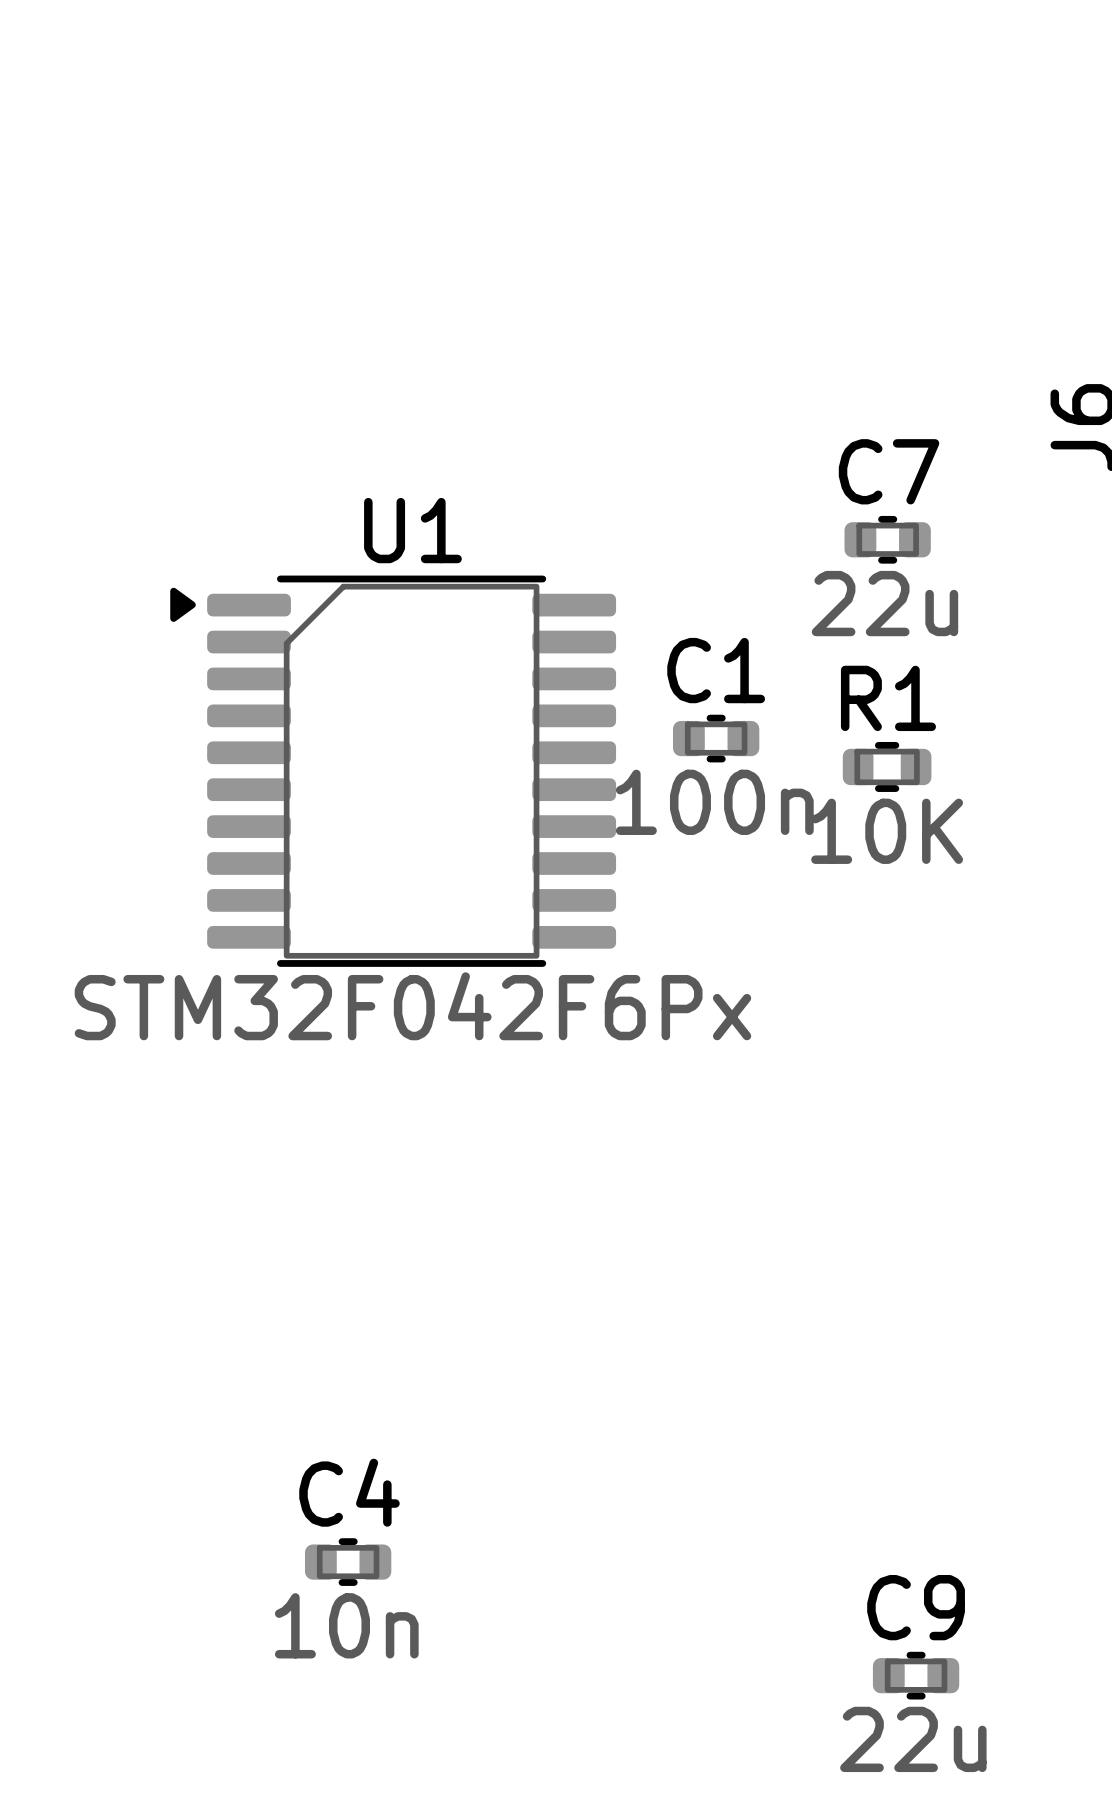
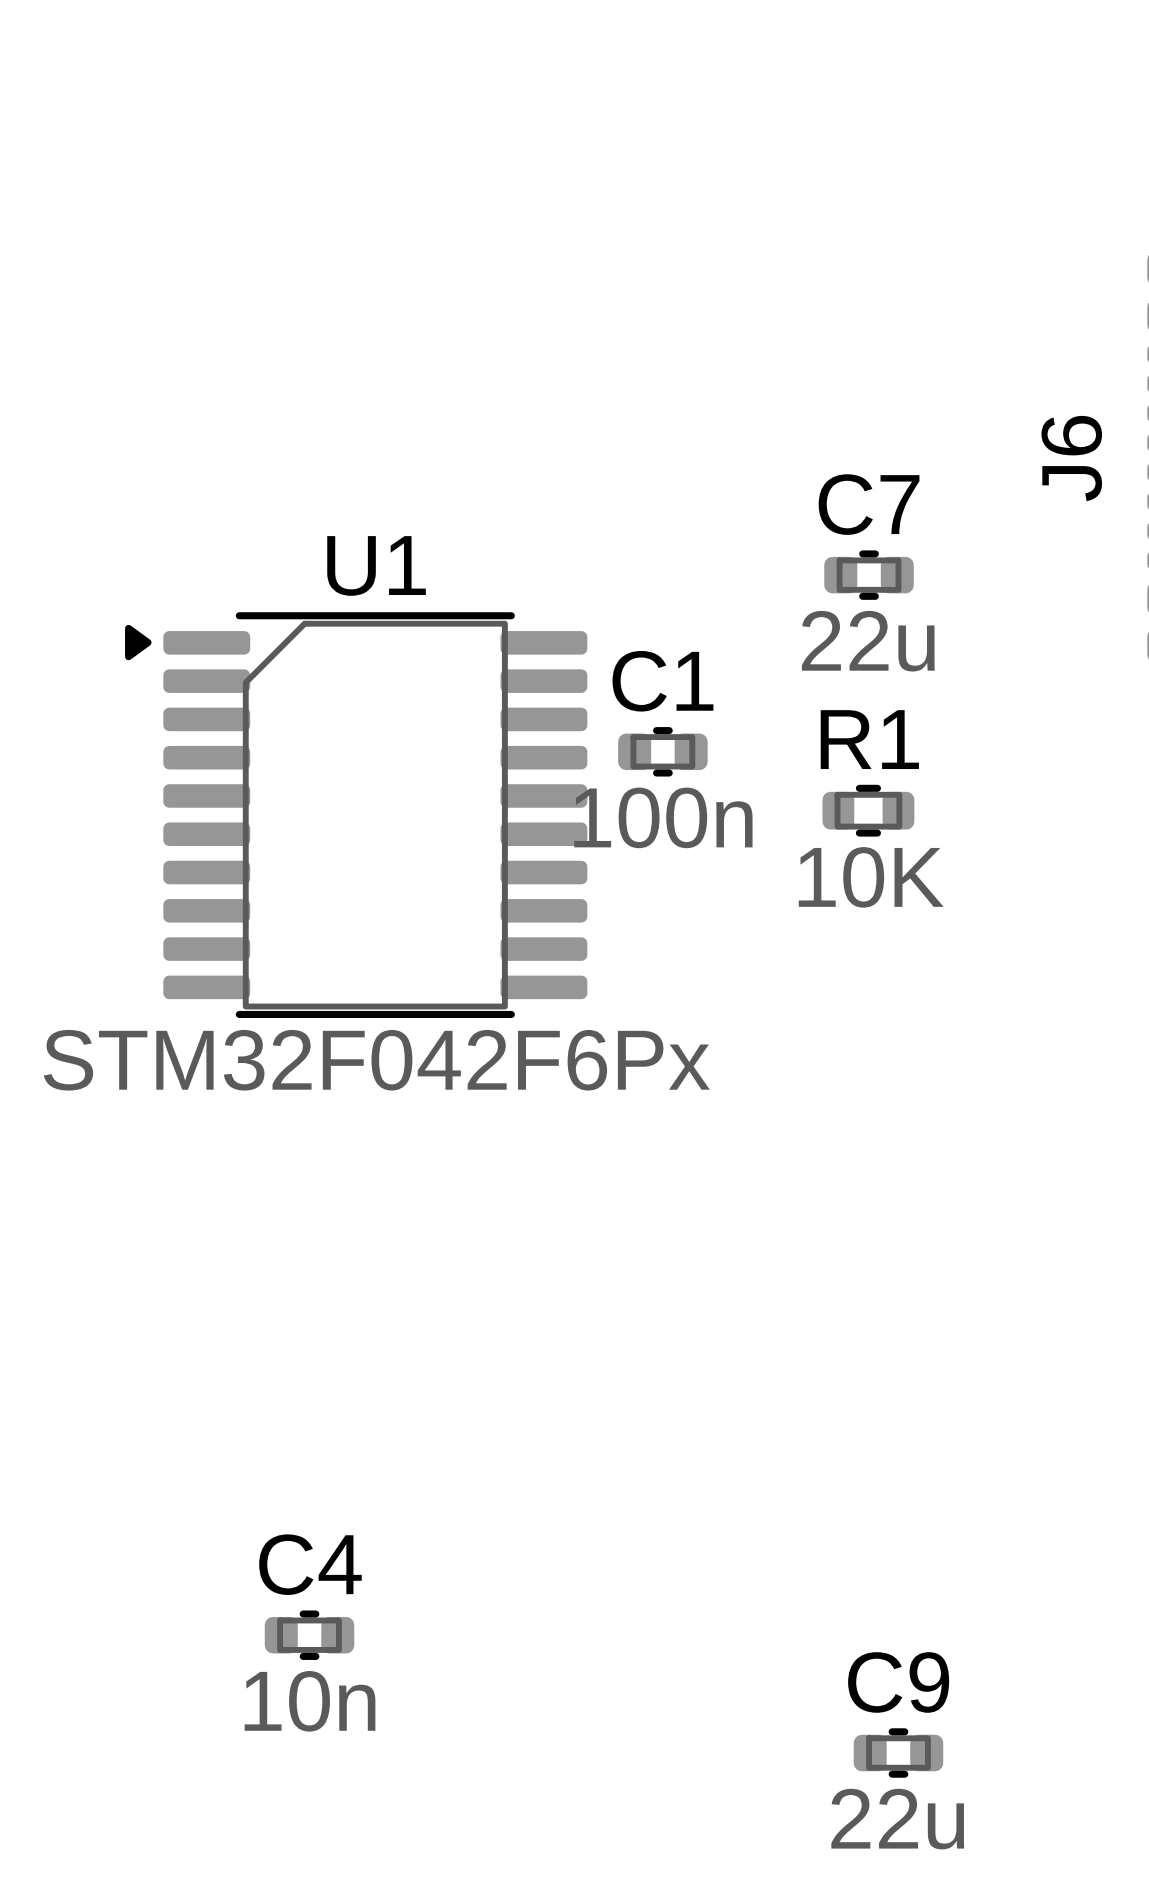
C1 position: (716, 738) -> (662, 751)

